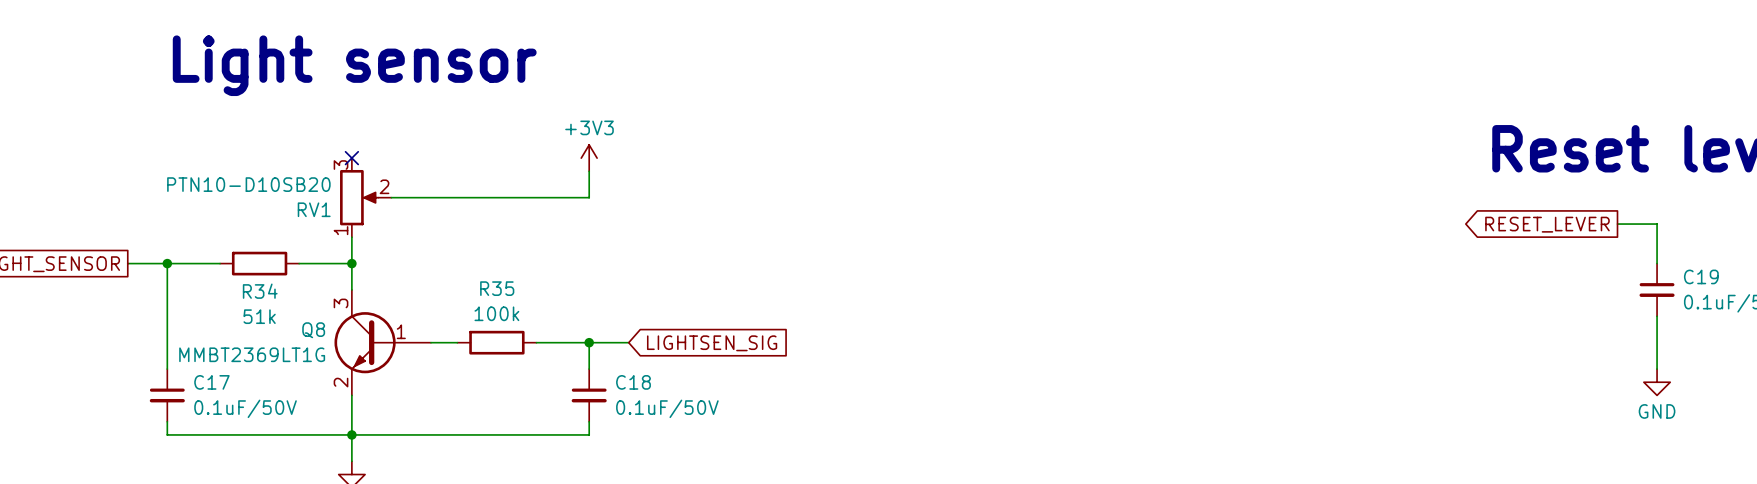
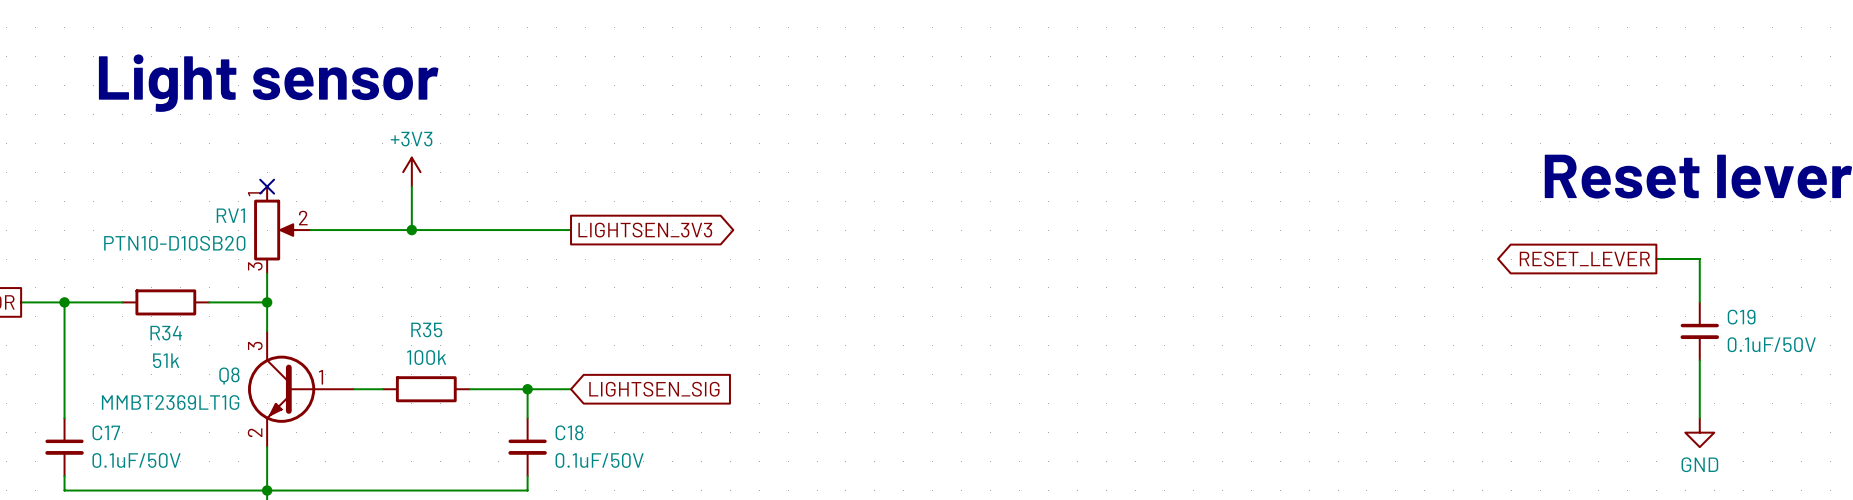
wire: none -> (411, 186) (411, 230)
power symbol position: +3V3 (589, 158) -> +3V3 (411, 172)
wire: (589, 171) (589, 197) -> (571, 230) (527, 230)
RV1 flip: as is (359, 197) -> up-down (275, 230)
junction: none -> (411, 230)
global label: none -> LIGHTSEN_3V3 (645, 230)

